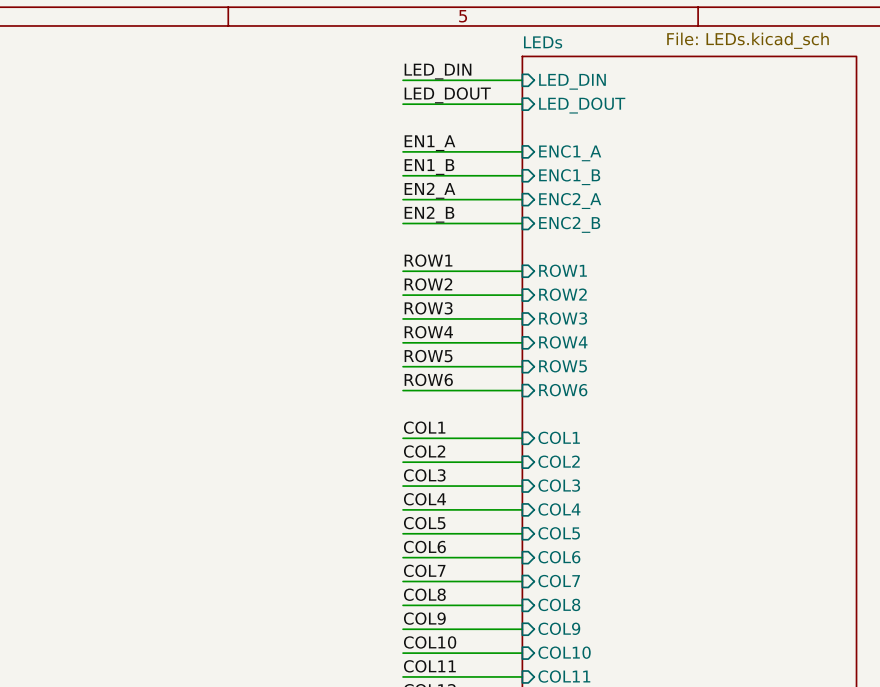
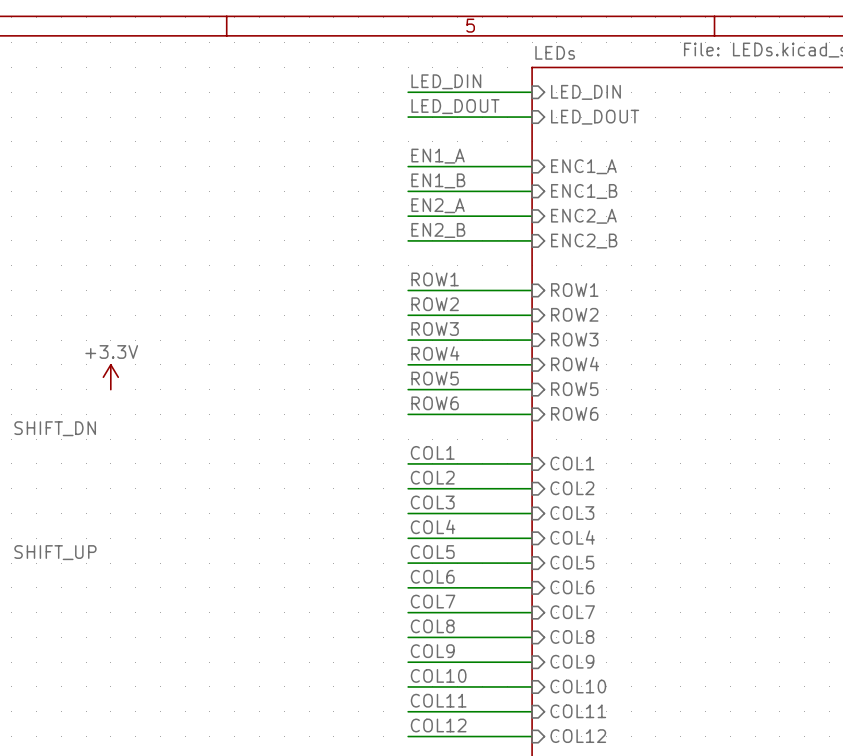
power symbol: none -> +3.3V (110, 377)
label: none -> SHIFT_DN (55, 428)
label: none -> SHIFT_UP (55, 552)

